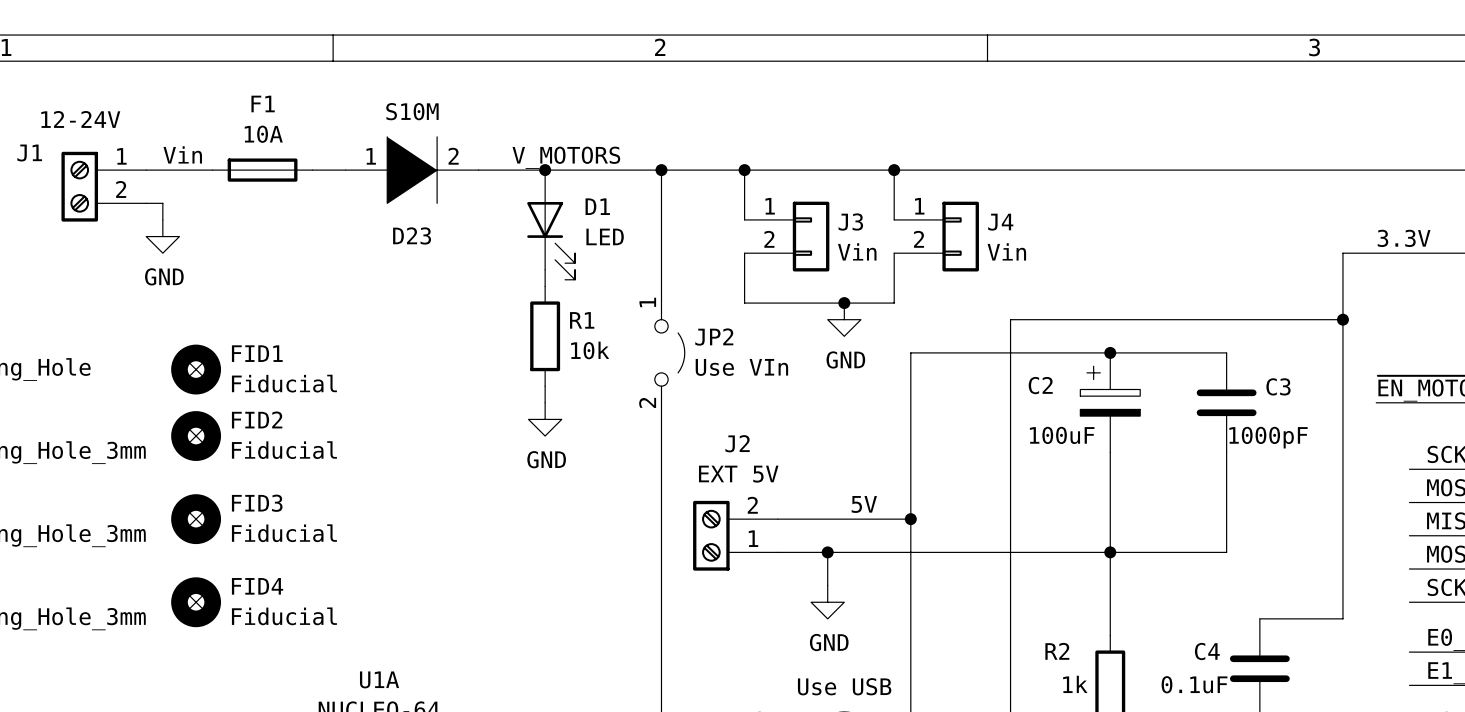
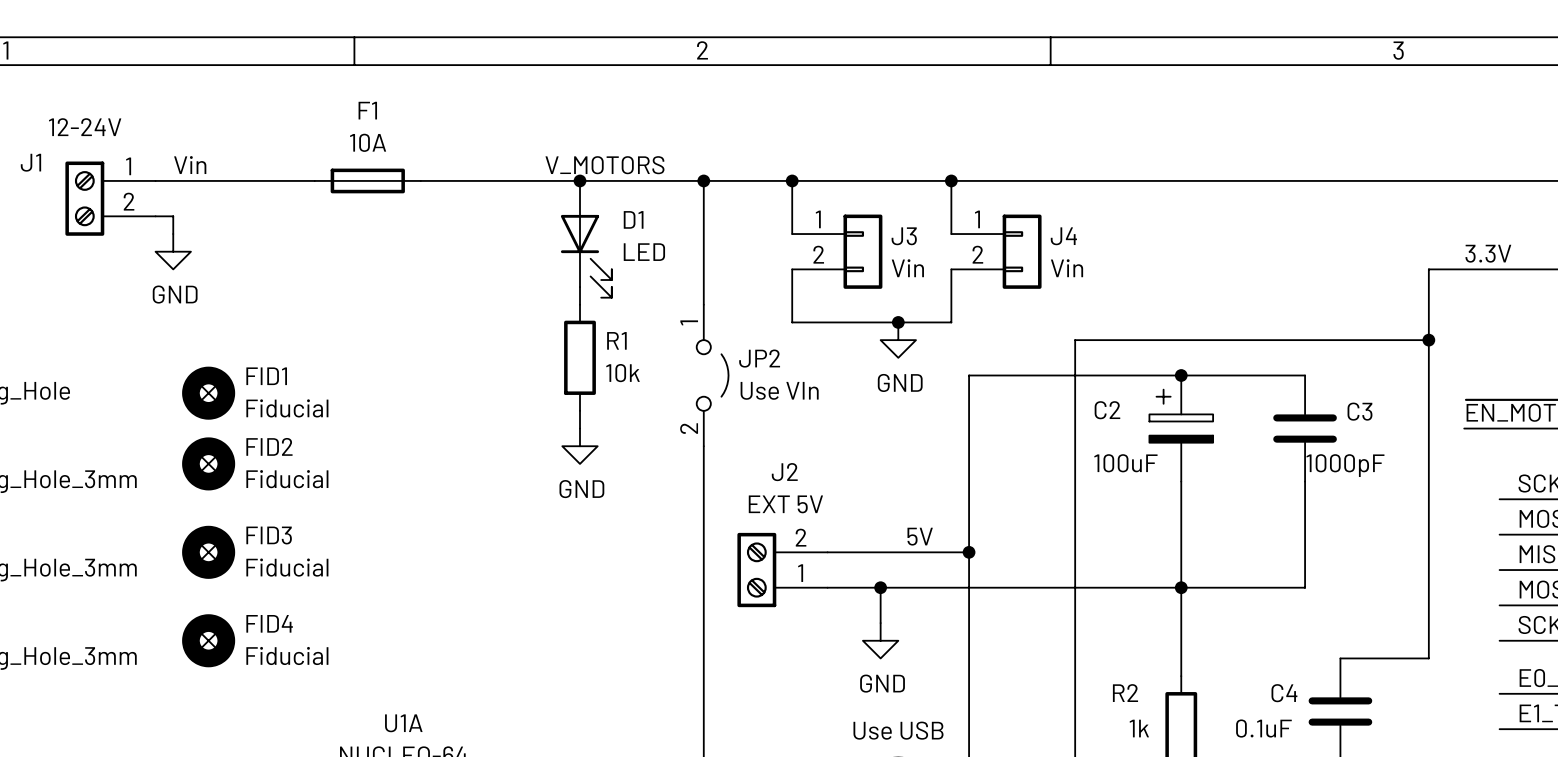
F1 position: (262, 170) -> (367, 180)
D23: S10M (412, 170) -> none

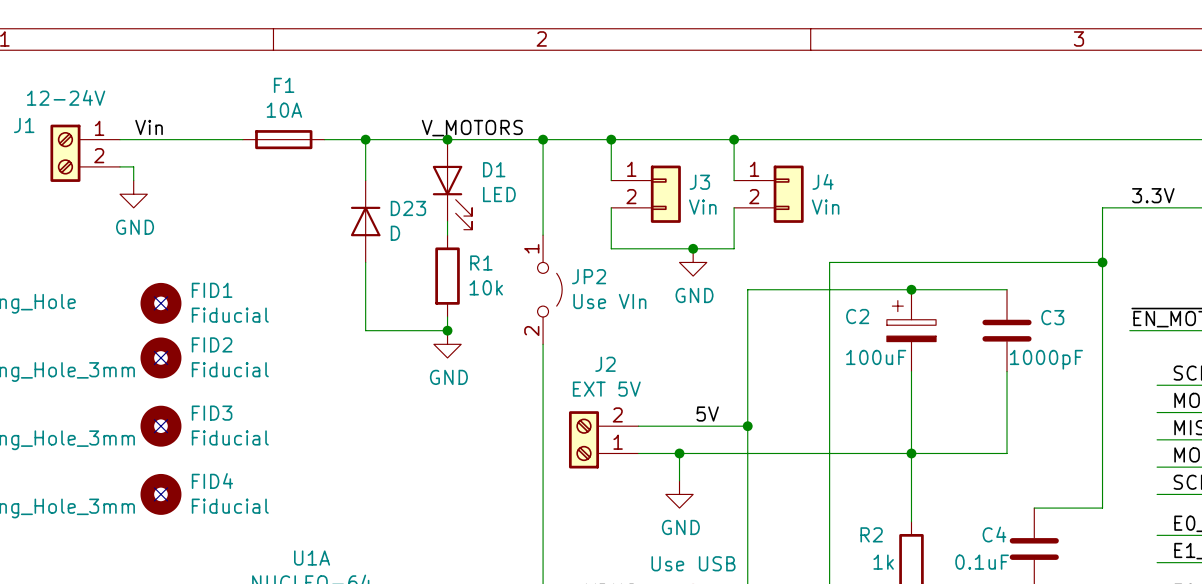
wire: none -> (365, 139) (365, 180)
junction: none -> (365, 139)
D23: none -> D (365, 221)
wire: none -> (365, 262) (365, 330) (447, 330)
junction: none -> (447, 330)

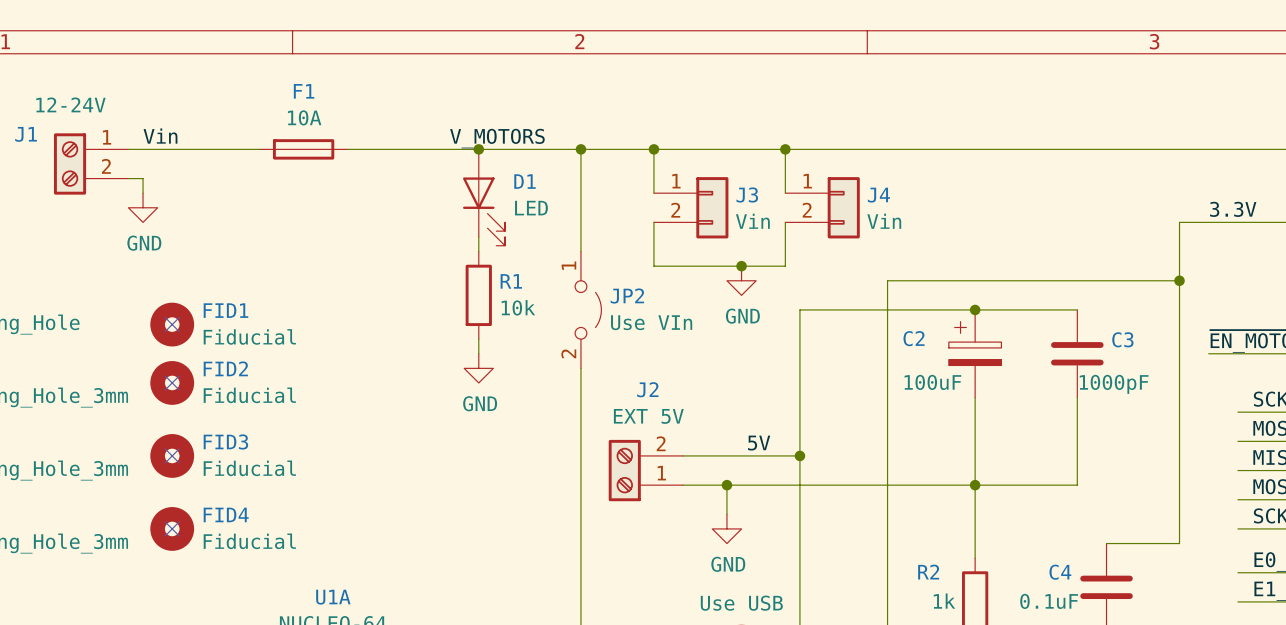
wire: (365, 139) (365, 180) -> none
junction: (365, 139) -> none
D23: D (365, 221) -> none
wire: (365, 262) (365, 330) (447, 330) -> none
junction: (447, 330) -> none

